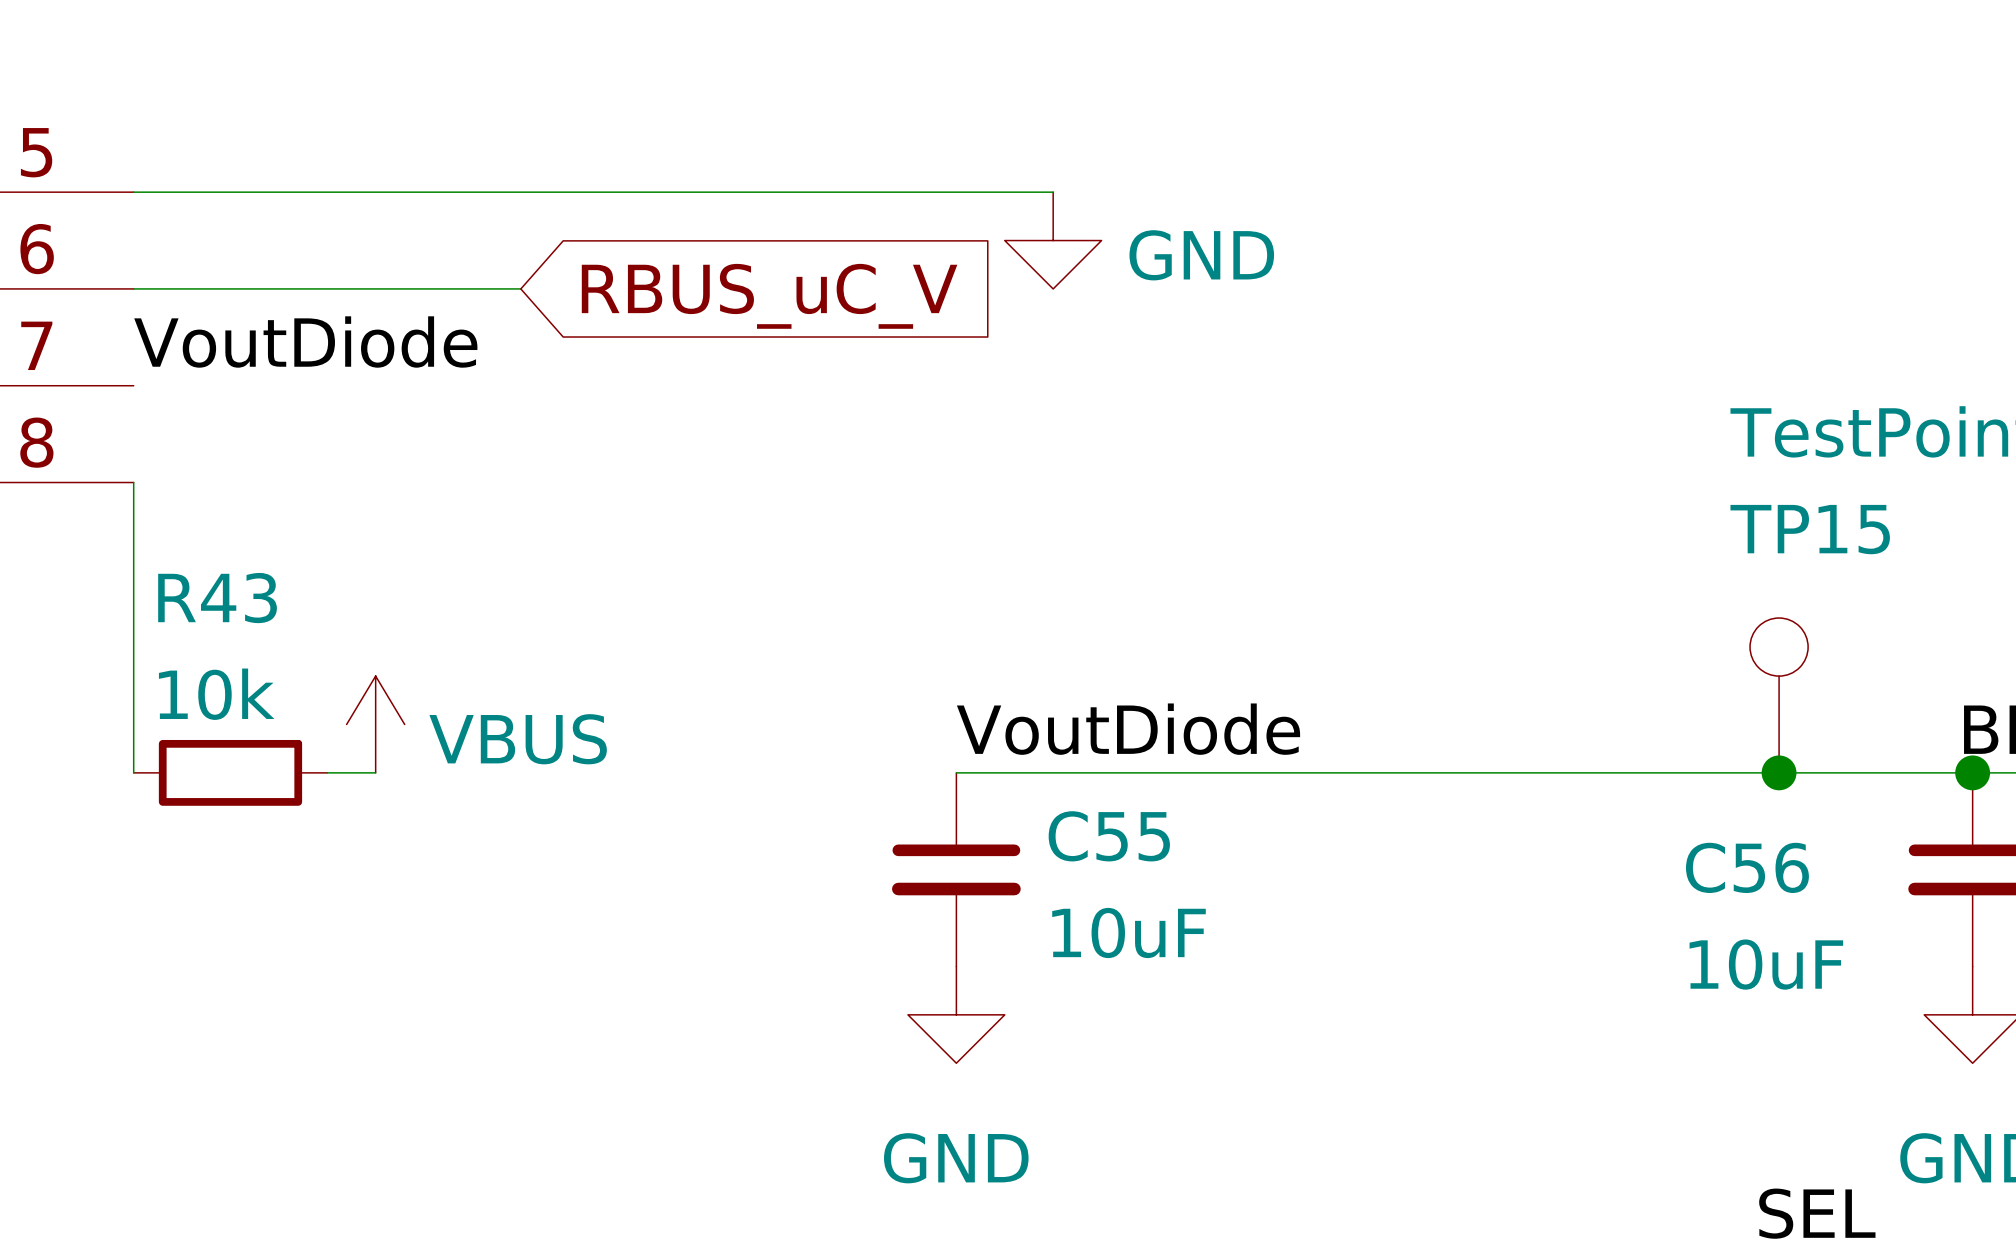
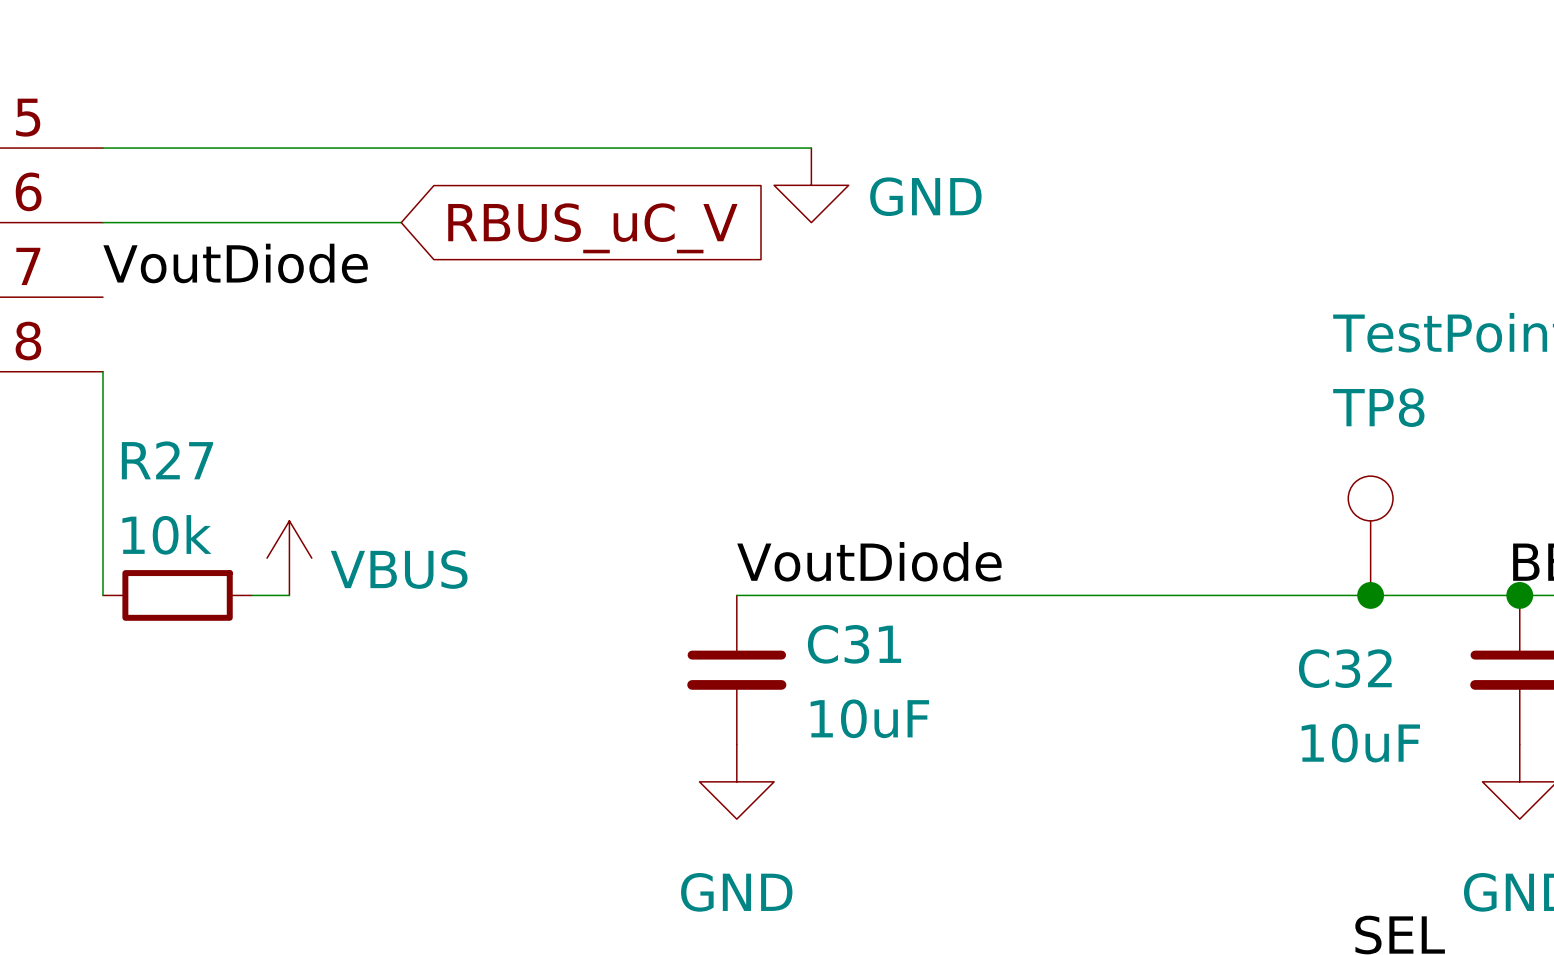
TP15 name: TP15 (1810, 529) -> TP8 (1378, 407)
R43 name: R43 (217, 598) -> R27 (167, 460)
C55 name: C55 (1109, 836) -> C31 (854, 644)
C56 name: C56 (1747, 867) -> C32 (1345, 668)

